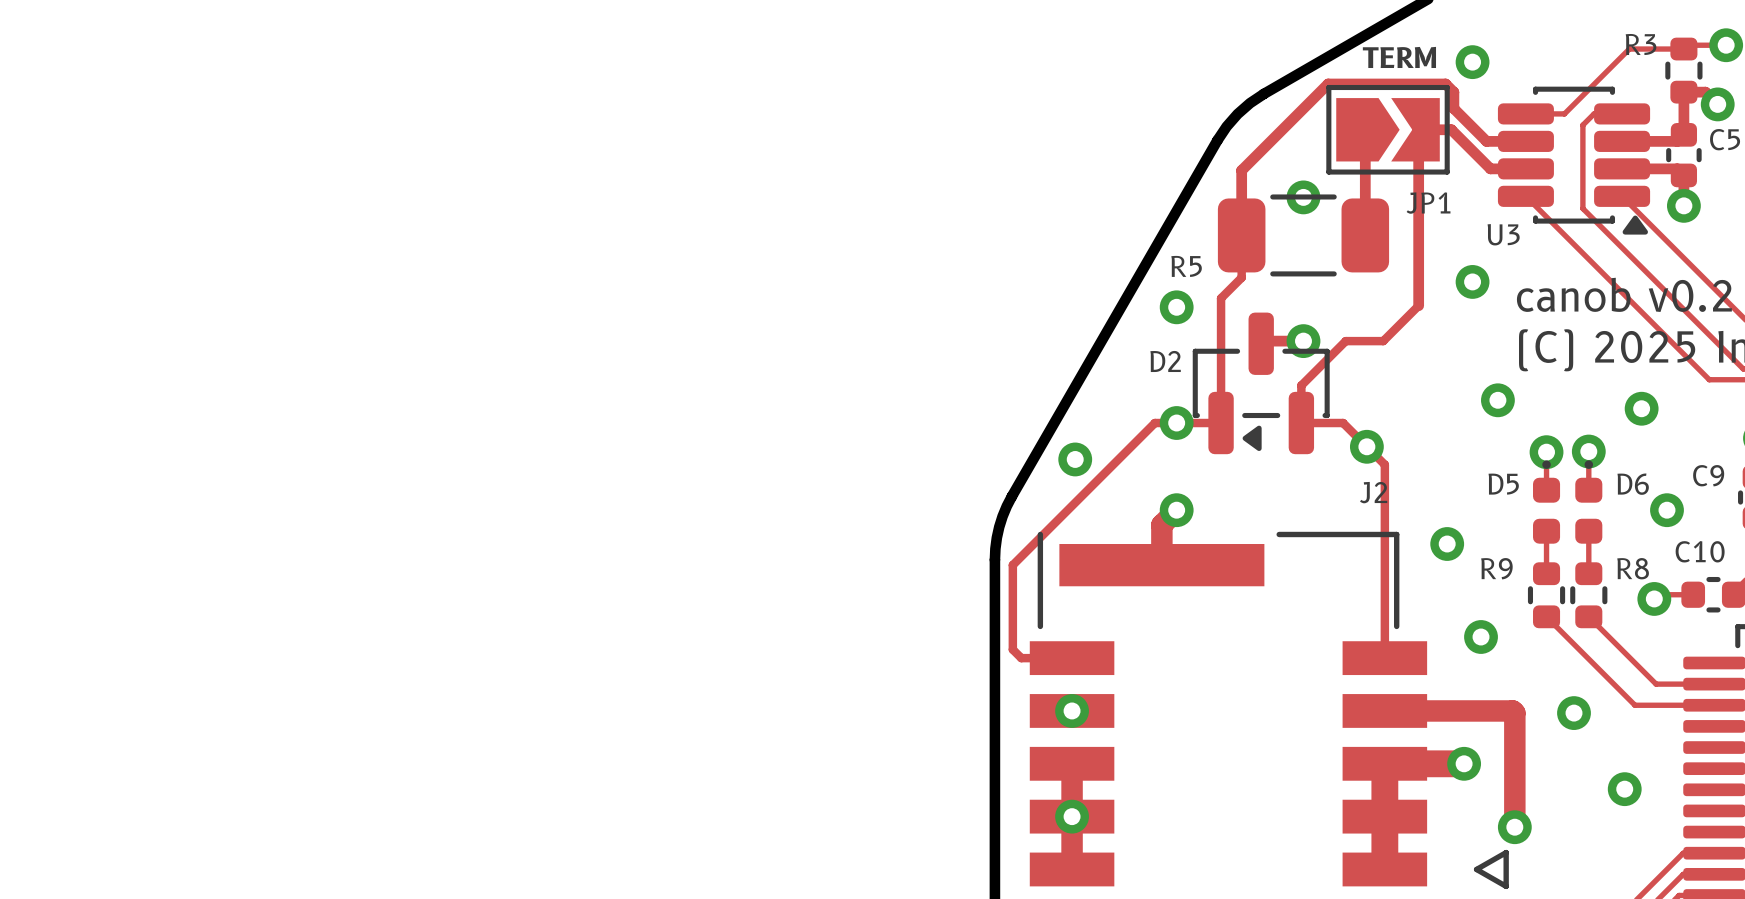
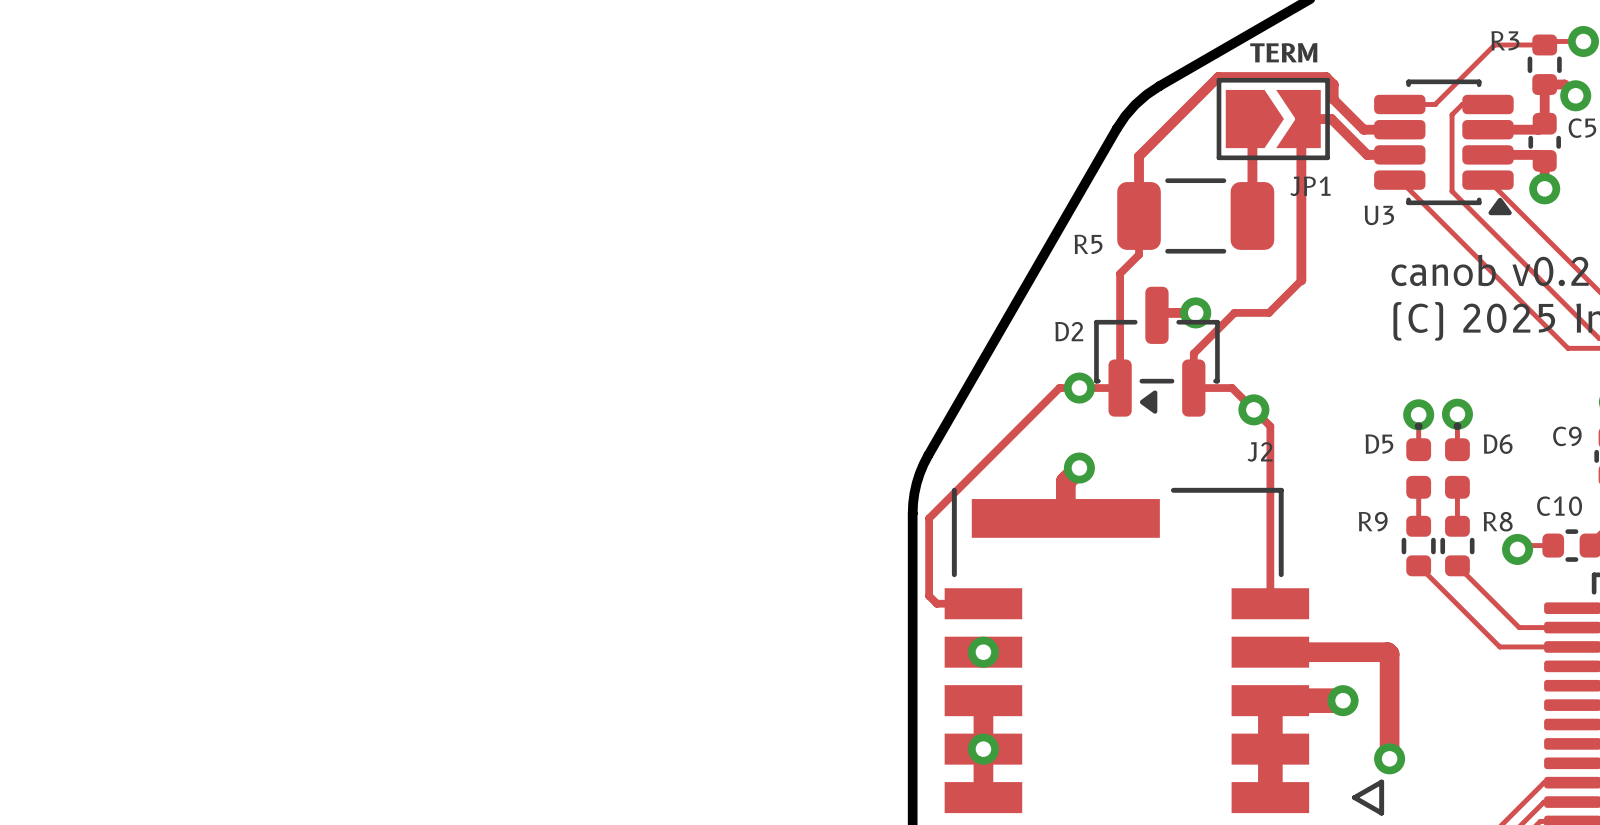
via: (1472, 62) -> none
via: (1303, 197) -> none
via: (1472, 281) -> none
via: (1176, 307) -> none
via: (1497, 400) -> none
via: (1641, 408) -> none
via: (1075, 459) -> none
via: (1667, 510) -> none
via: (1447, 544) -> none
via: (1481, 637) -> none
via: (1574, 713) -> none
via: (1624, 789) -> none

